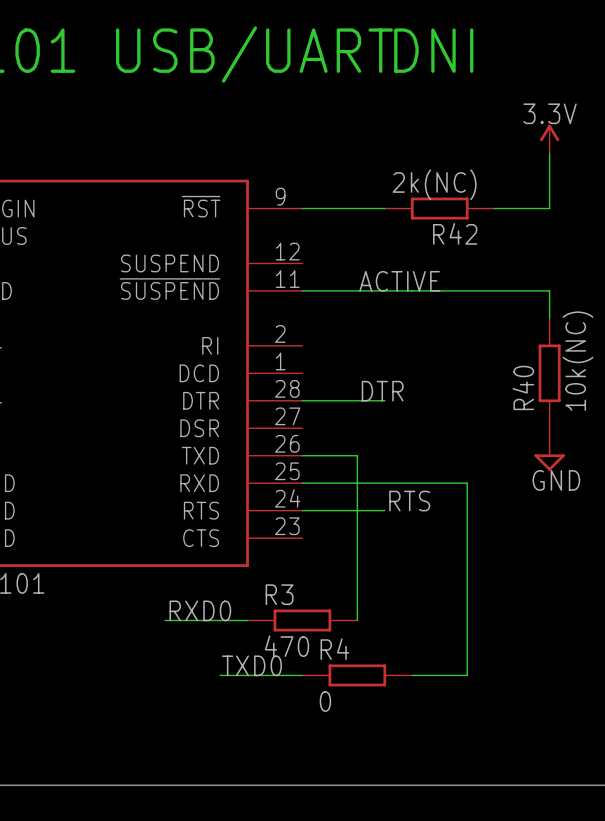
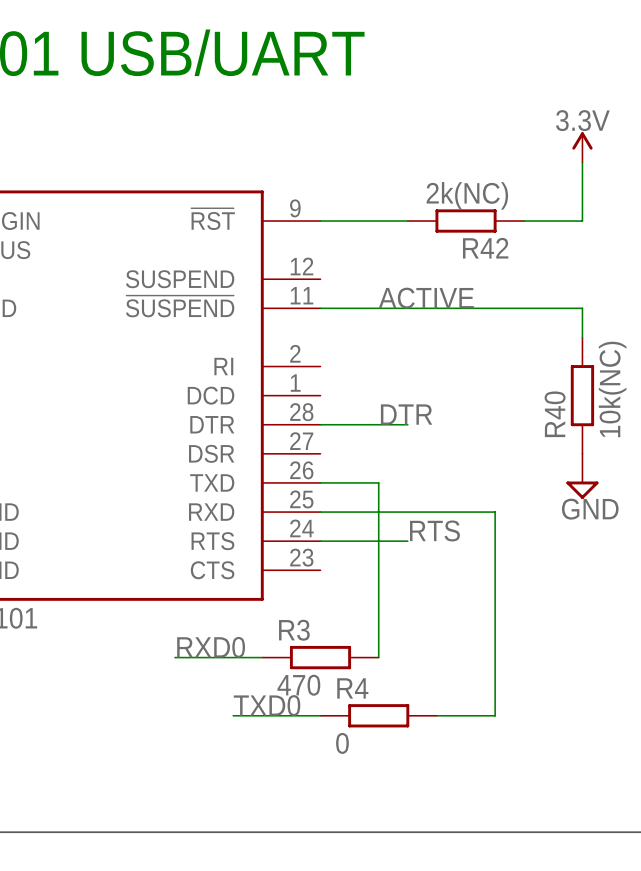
text: DNI (433, 50) -> none

